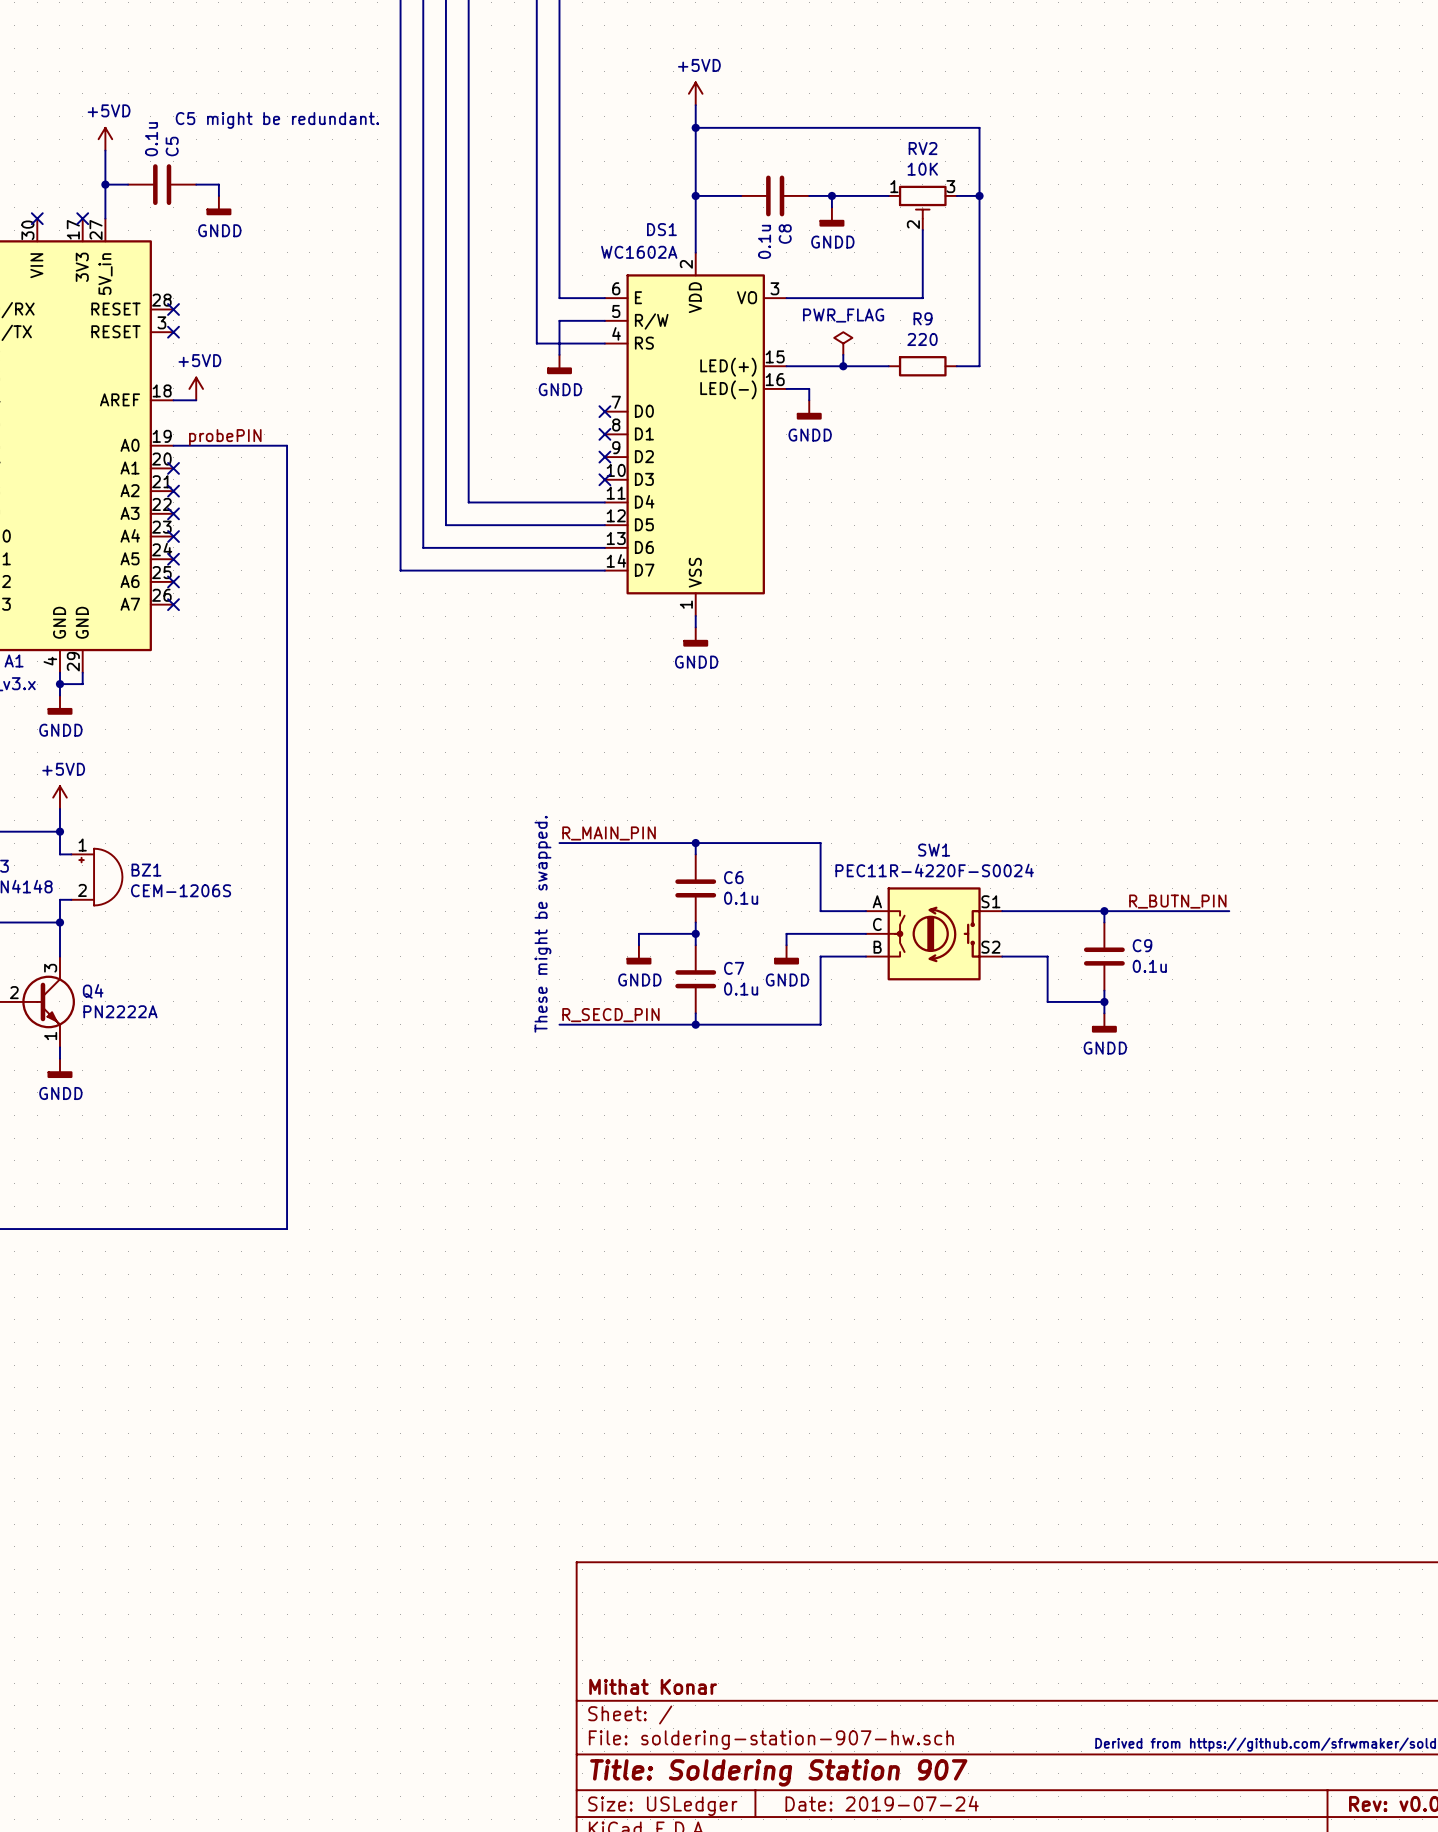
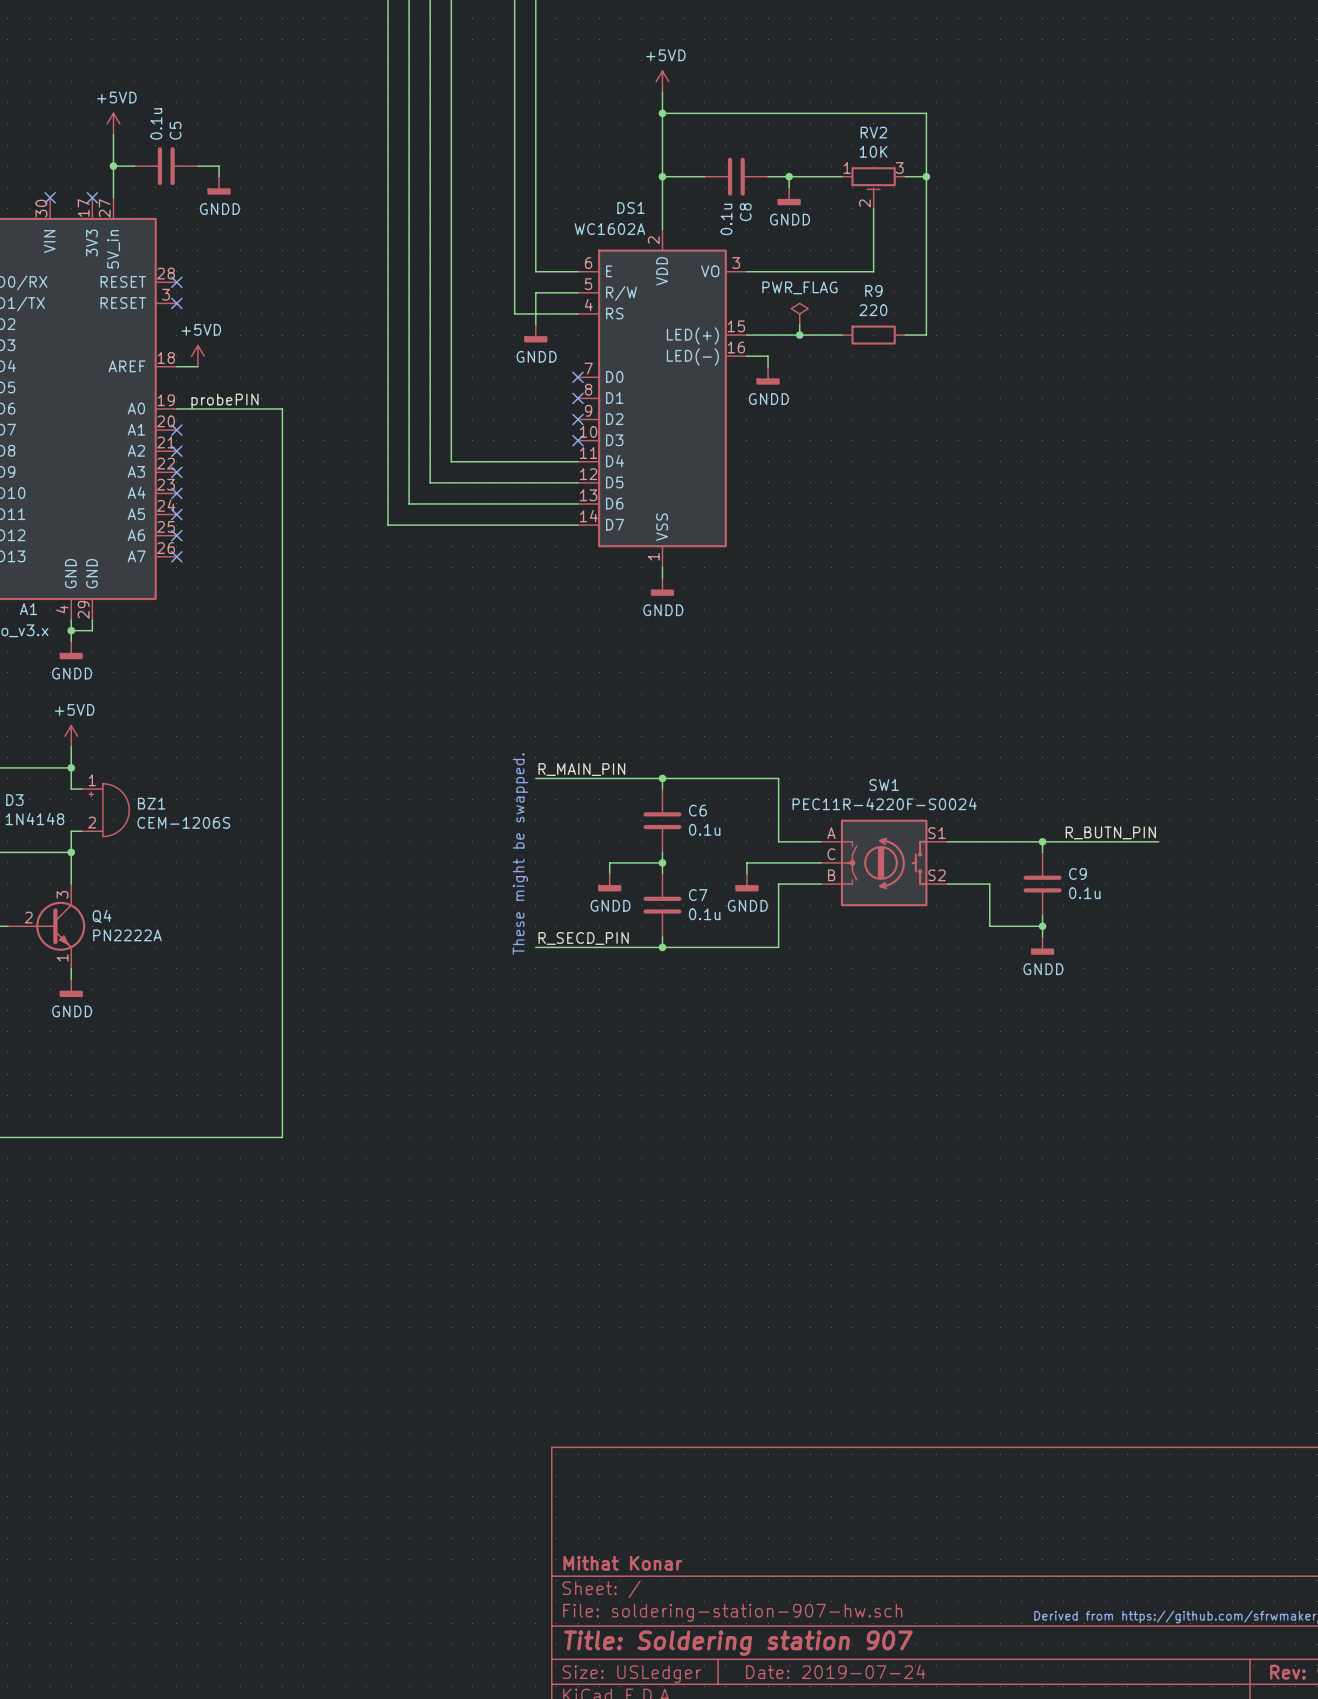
text: C5 might be redundant. (277, 120) -> none
title block: Title: Soldering Station 907 (778, 1772) -> Title: Soldering station 907 (738, 1643)

